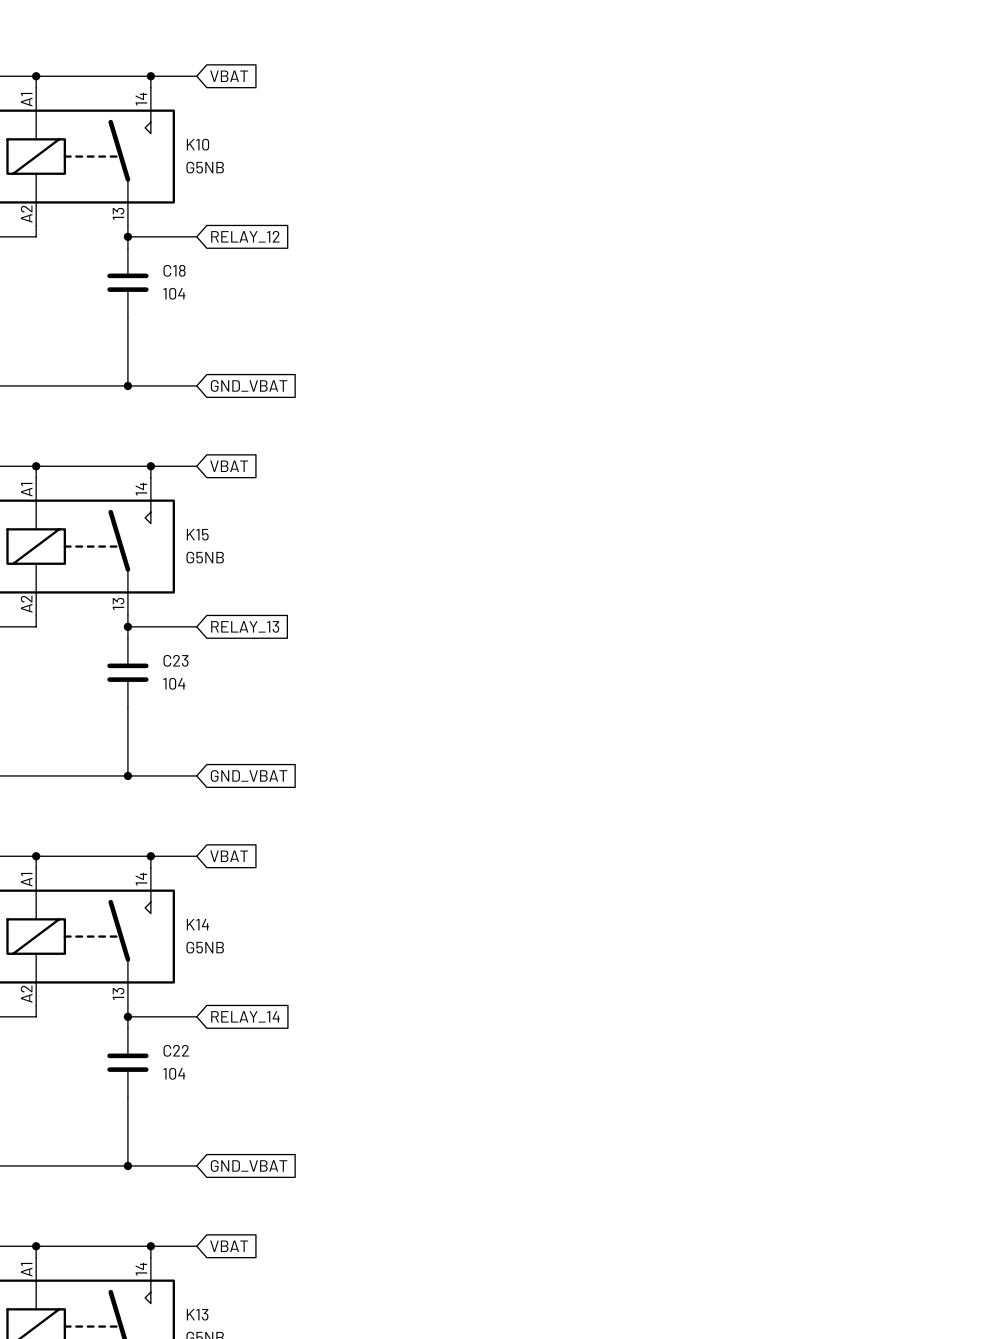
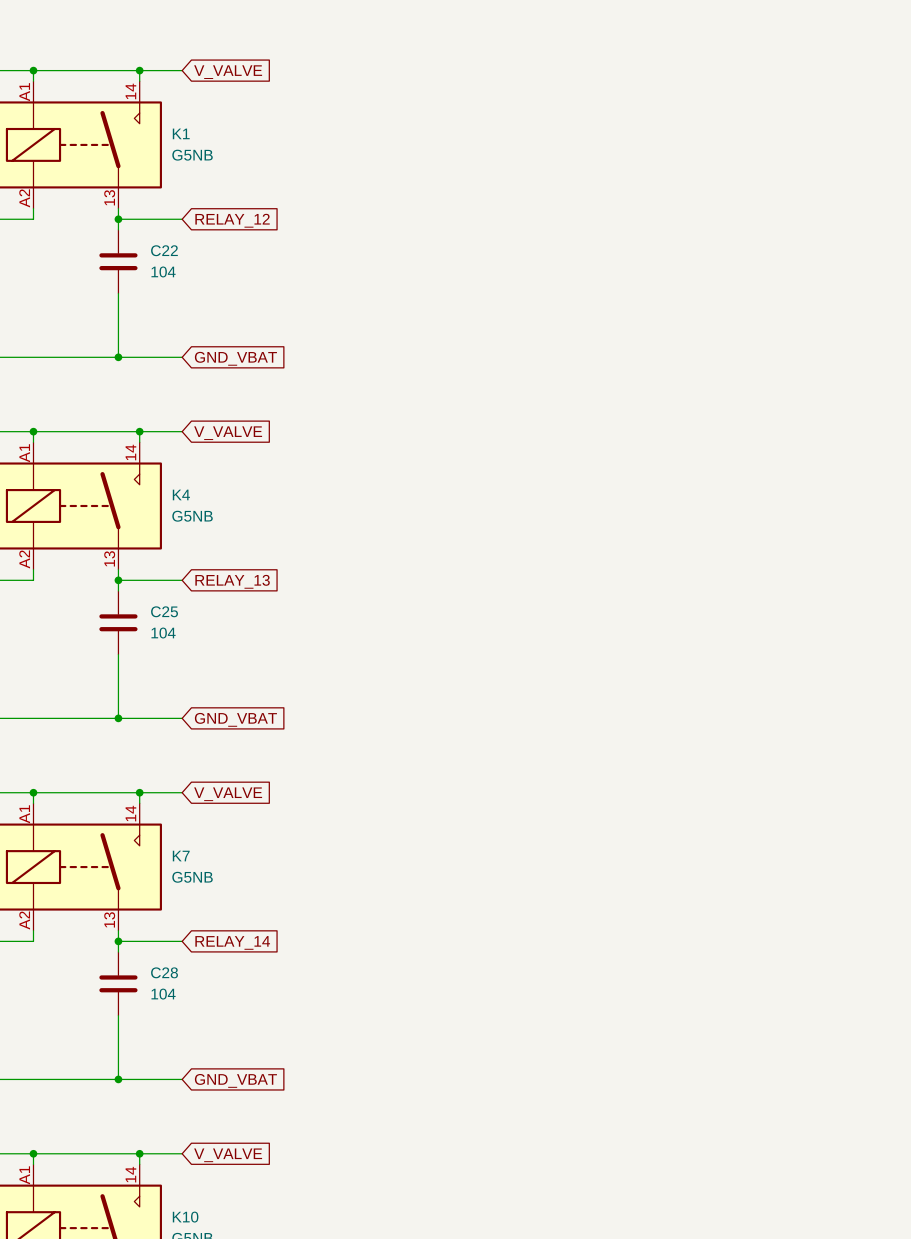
global label: VBAT (229, 76) -> V_VALVE (228, 72)
K10 name: K10 (197, 144) -> K1 (181, 133)
C18 name: C18 (174, 270) -> C22 (164, 250)
global label: VBAT (229, 466) -> V_VALVE (228, 433)
K15 name: K15 (197, 534) -> K4 (181, 494)
C23 name: C23 (175, 660) -> C25 (164, 611)
global label: VBAT (229, 856) -> V_VALVE (228, 794)
K14 name: K14 (197, 924) -> K7 (181, 856)
C22 name: C22 (176, 1050) -> C28 (164, 972)
global label: VBAT (229, 1246) -> V_VALVE (228, 1155)
K13 name: K13 (197, 1314) -> K10 (185, 1217)

